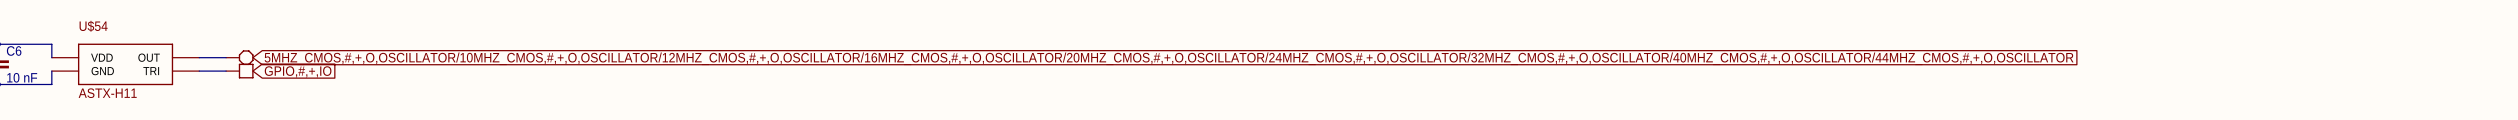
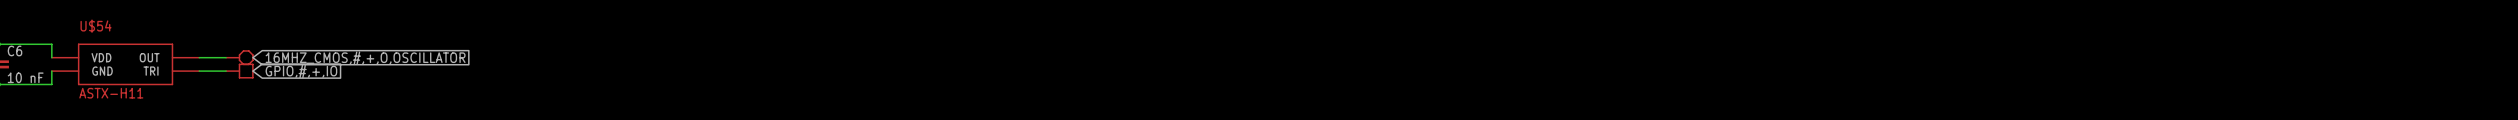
global label: 5MHZ_CMOS,#,+,O,OSCILLATOR/10MHZ_CMOS,#,+,O,OSCILLATOR/12MHZ_CMOS,#,+,O,OSCILLATOR/16MHZ_CMOS,#,+,O,OSCILLATOR/20MHZ_CMOS,#,+,O,OSCILLATOR/24MHZ_CMOS,#,+,O,OSCILLATOR/32MHZ_CMOS,#,+,O,OSCILLATOR/40MHZ_CMOS,#,+,O,OSCILLATOR/44MHZ_CMOS,#,+,O,OSCILLATOR (1169, 58) -> 16MHZ_CMOS,#,+,O,OSCILLATOR (365, 58)

